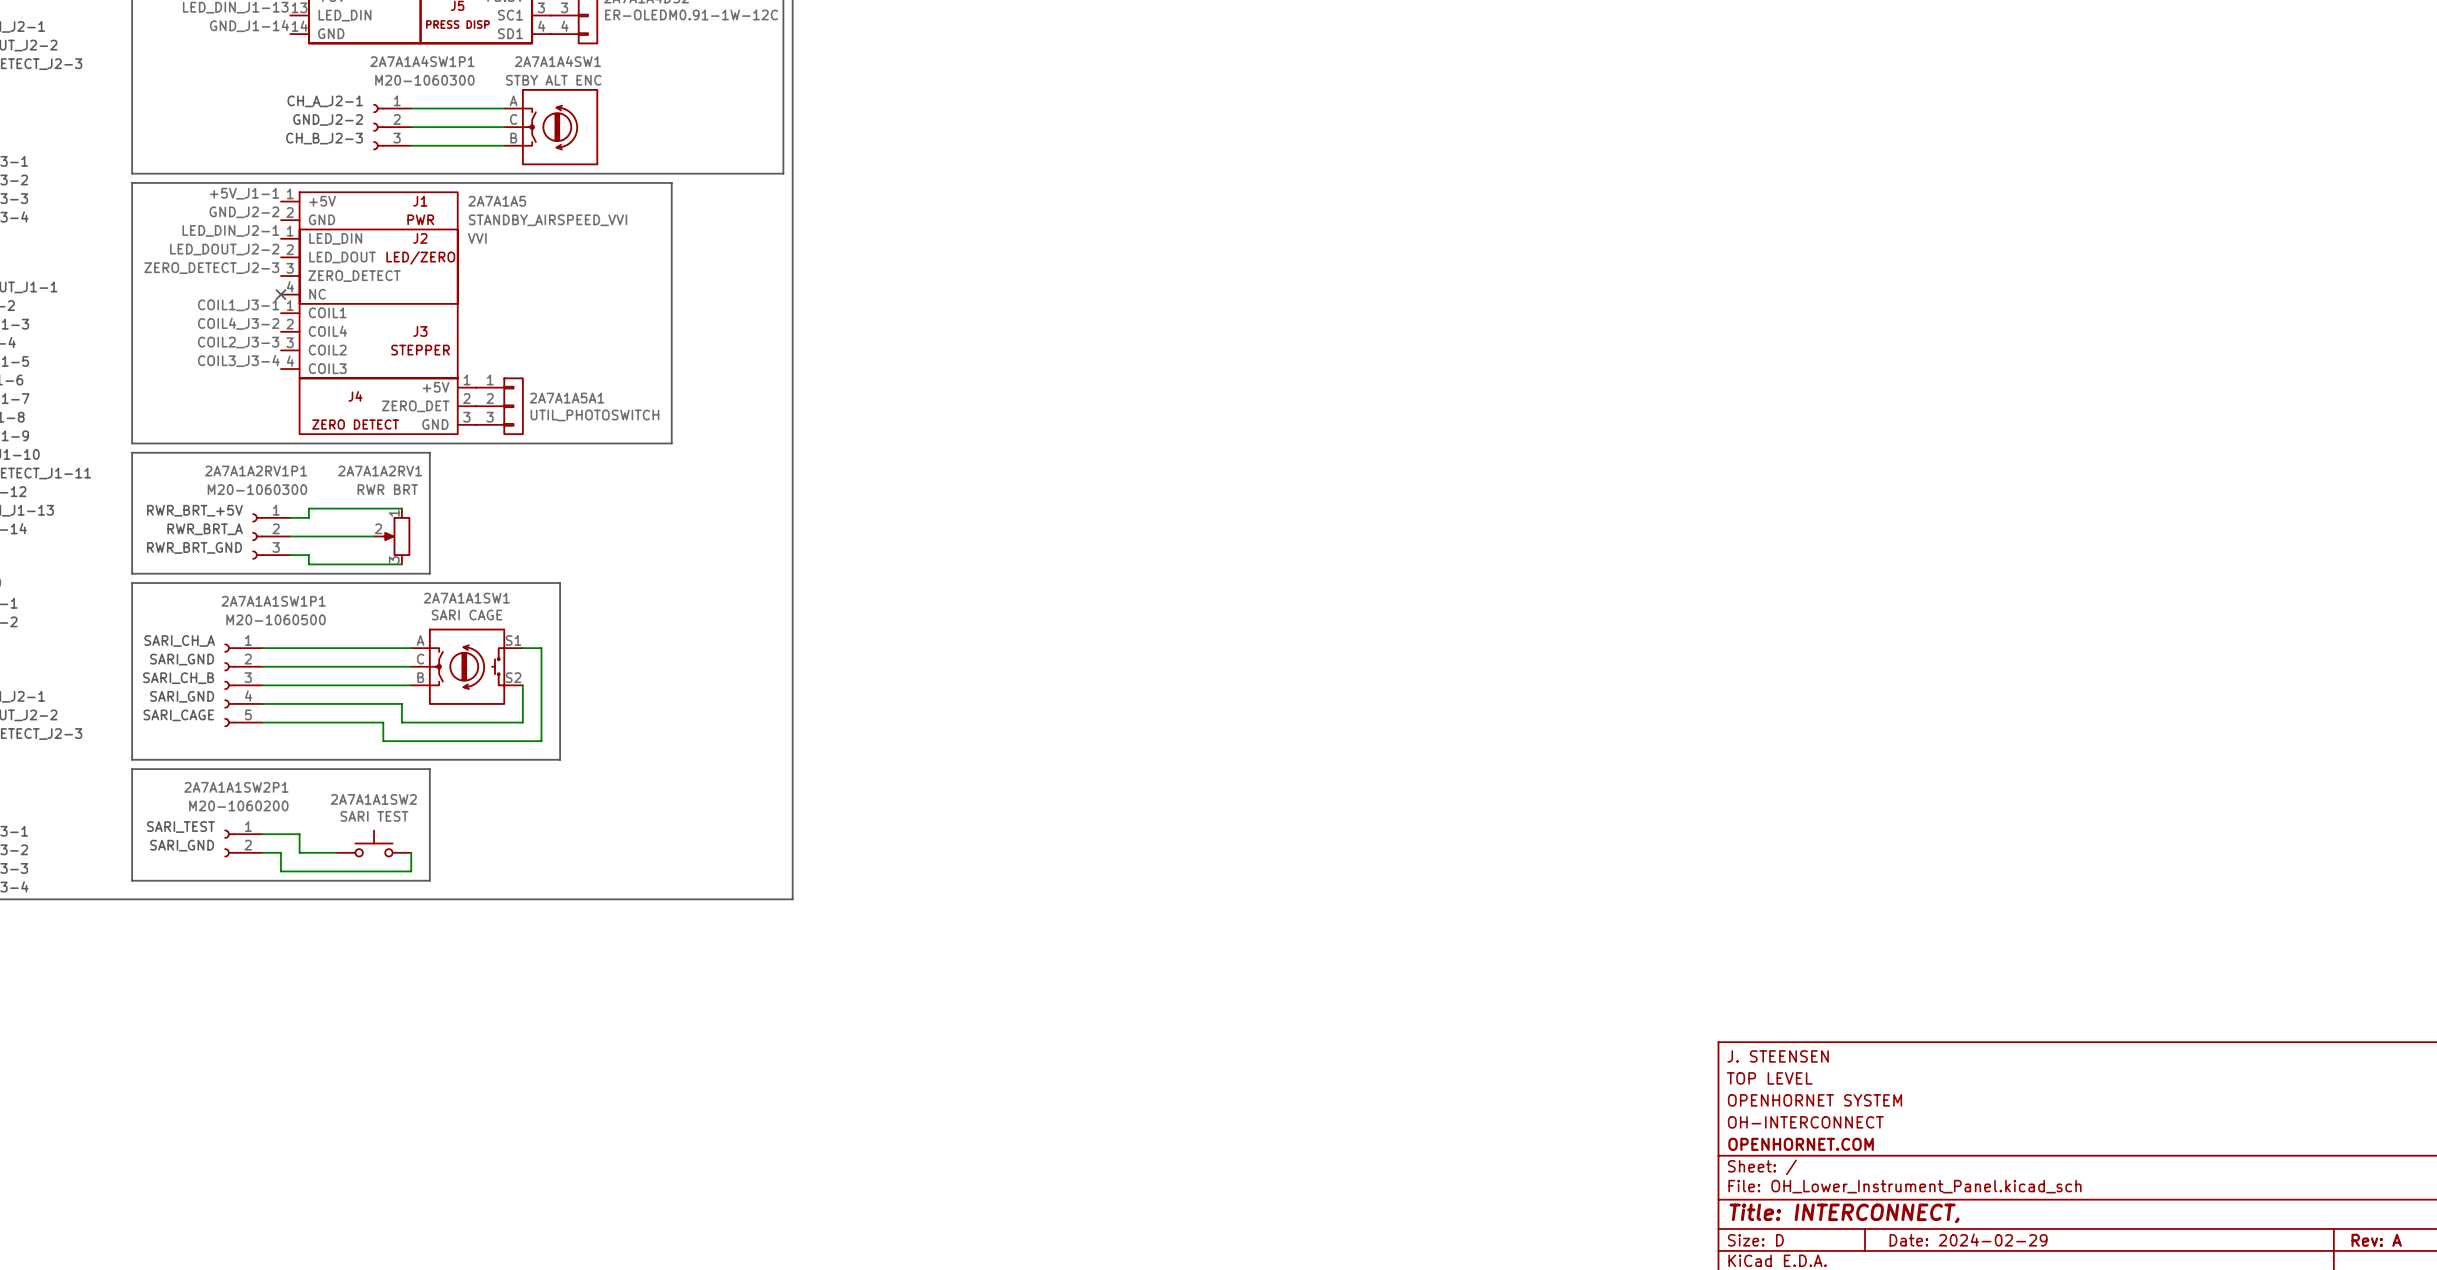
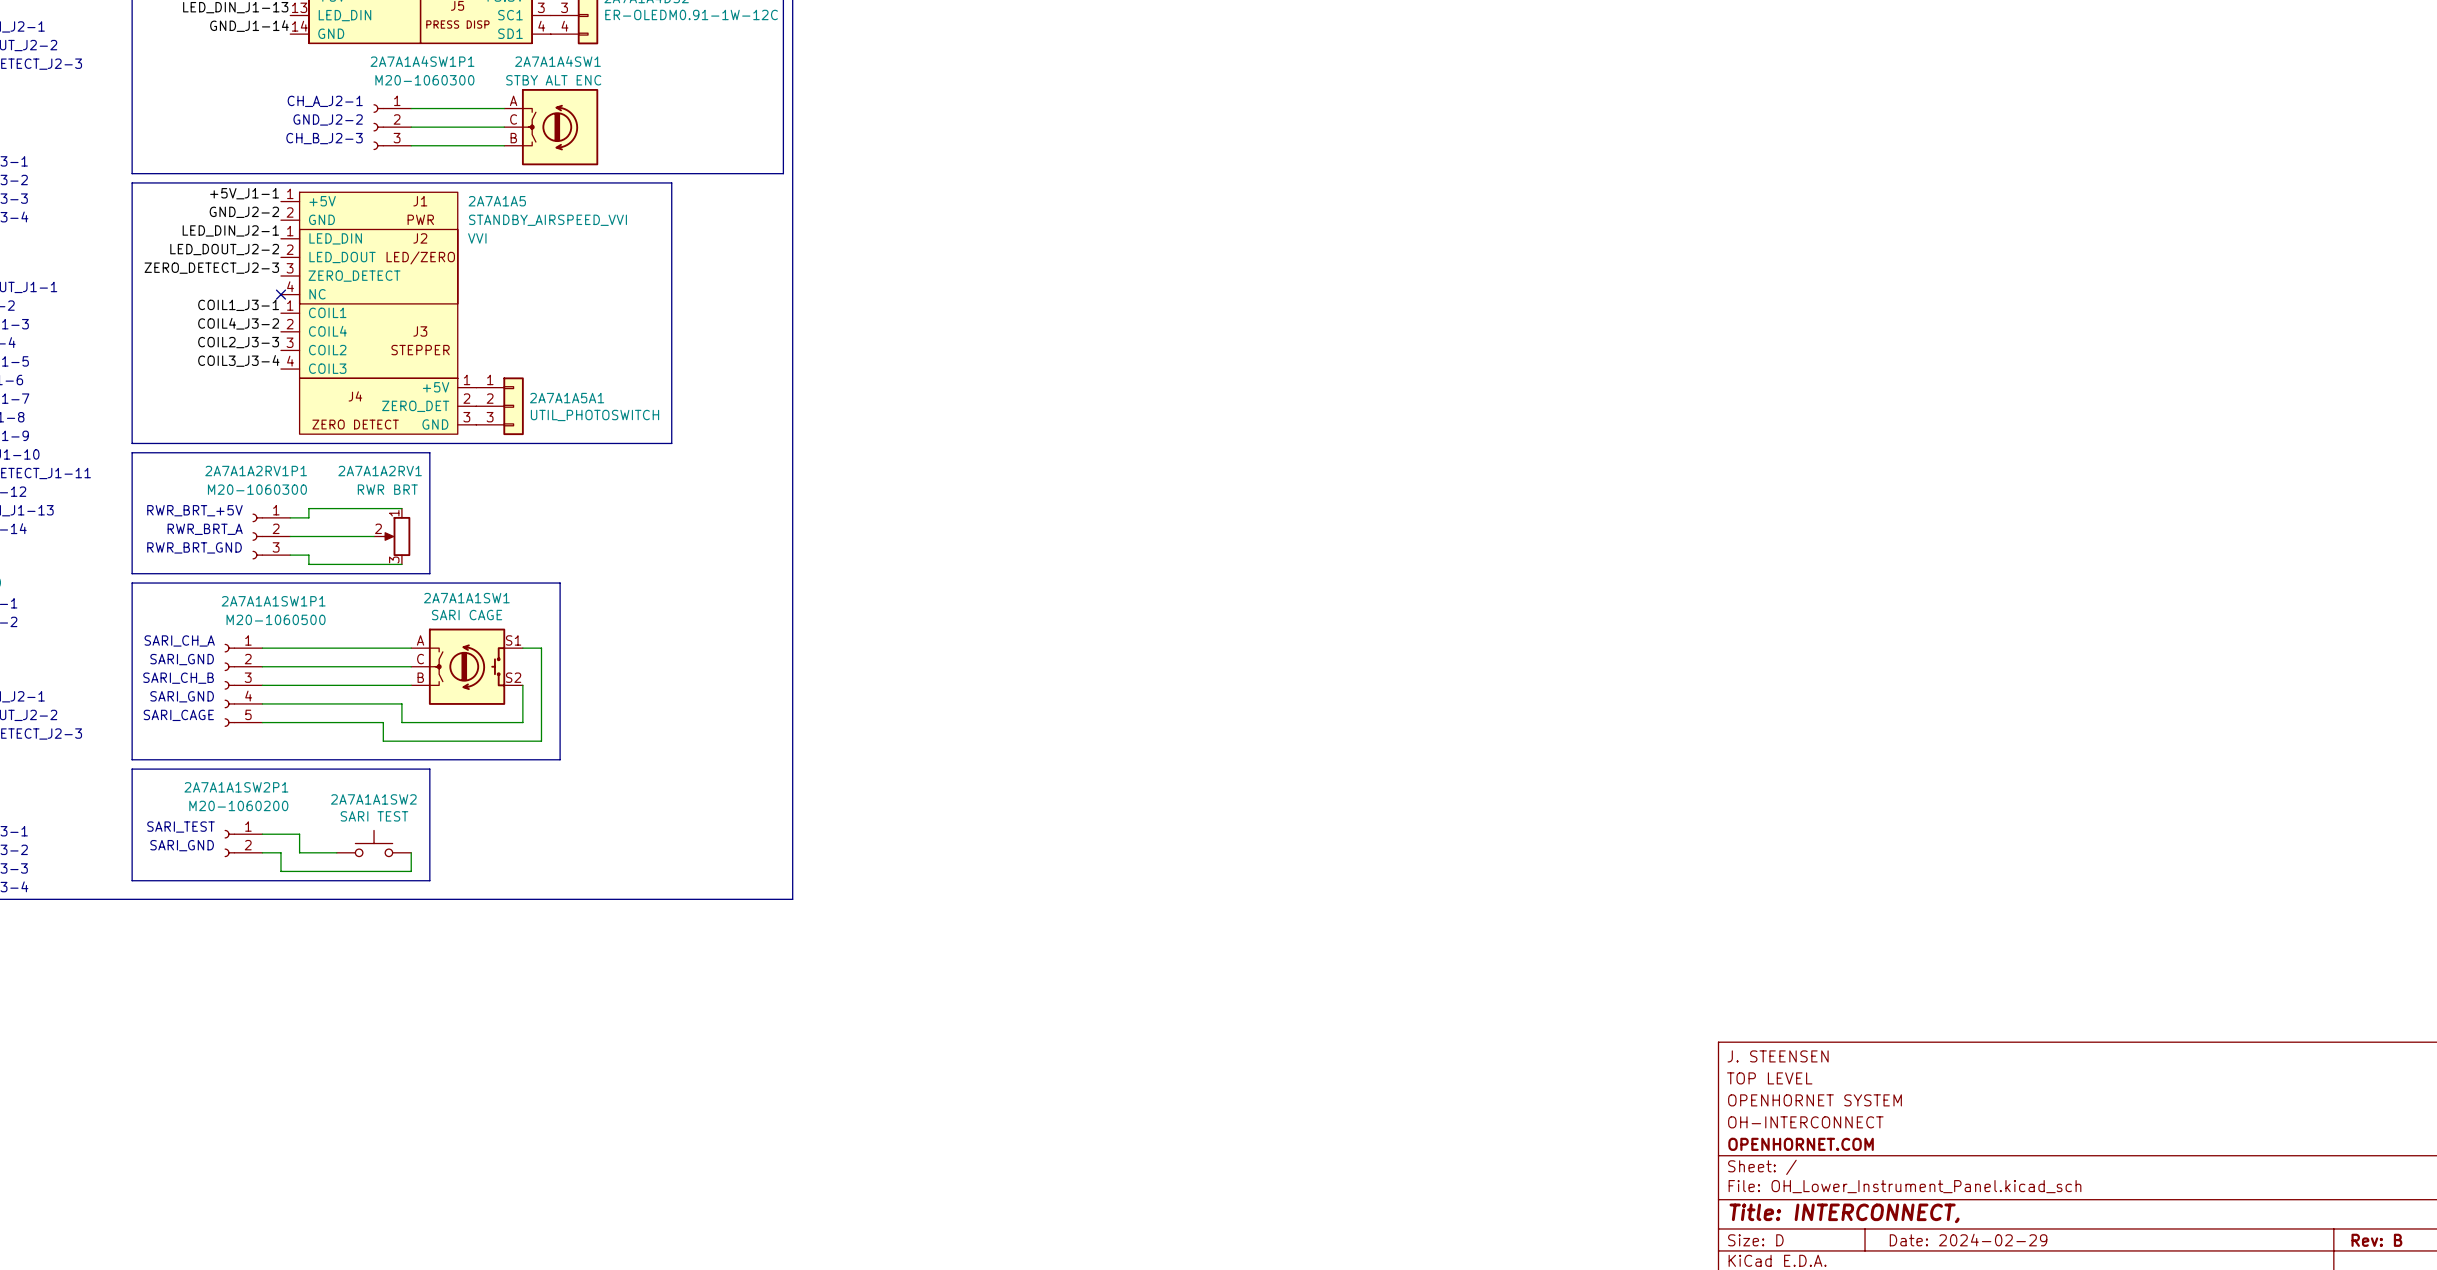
title block: Rev: A (2376, 1240) -> Rev: B (2376, 1240)

